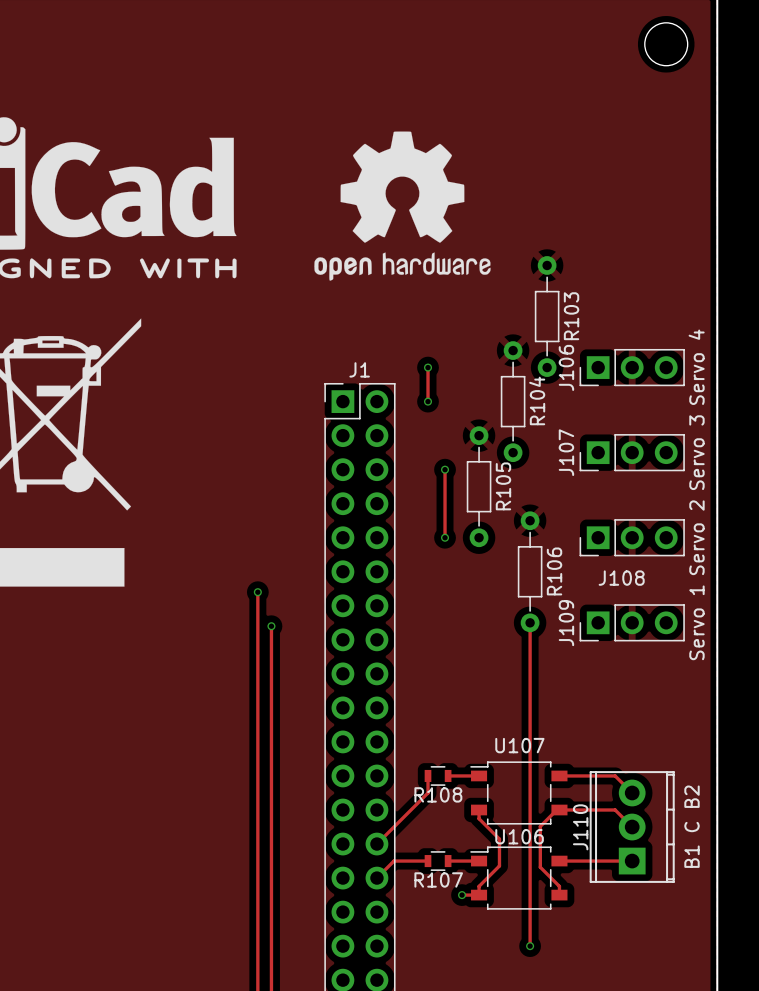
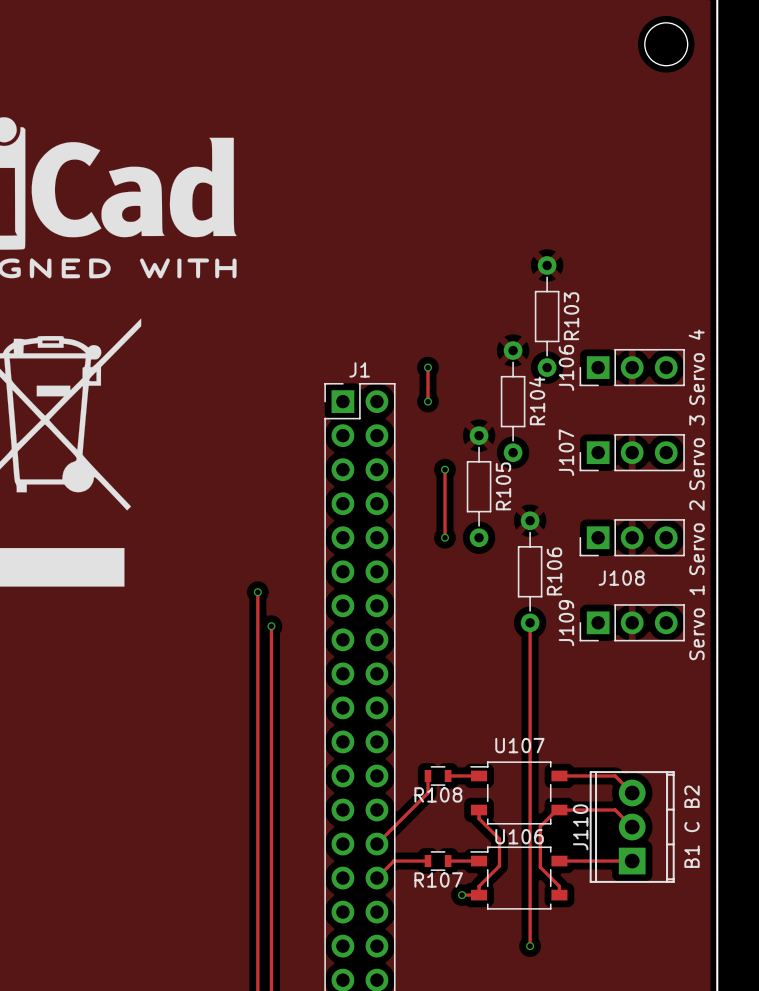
drawing: [314, 131, 491, 281] -> none

